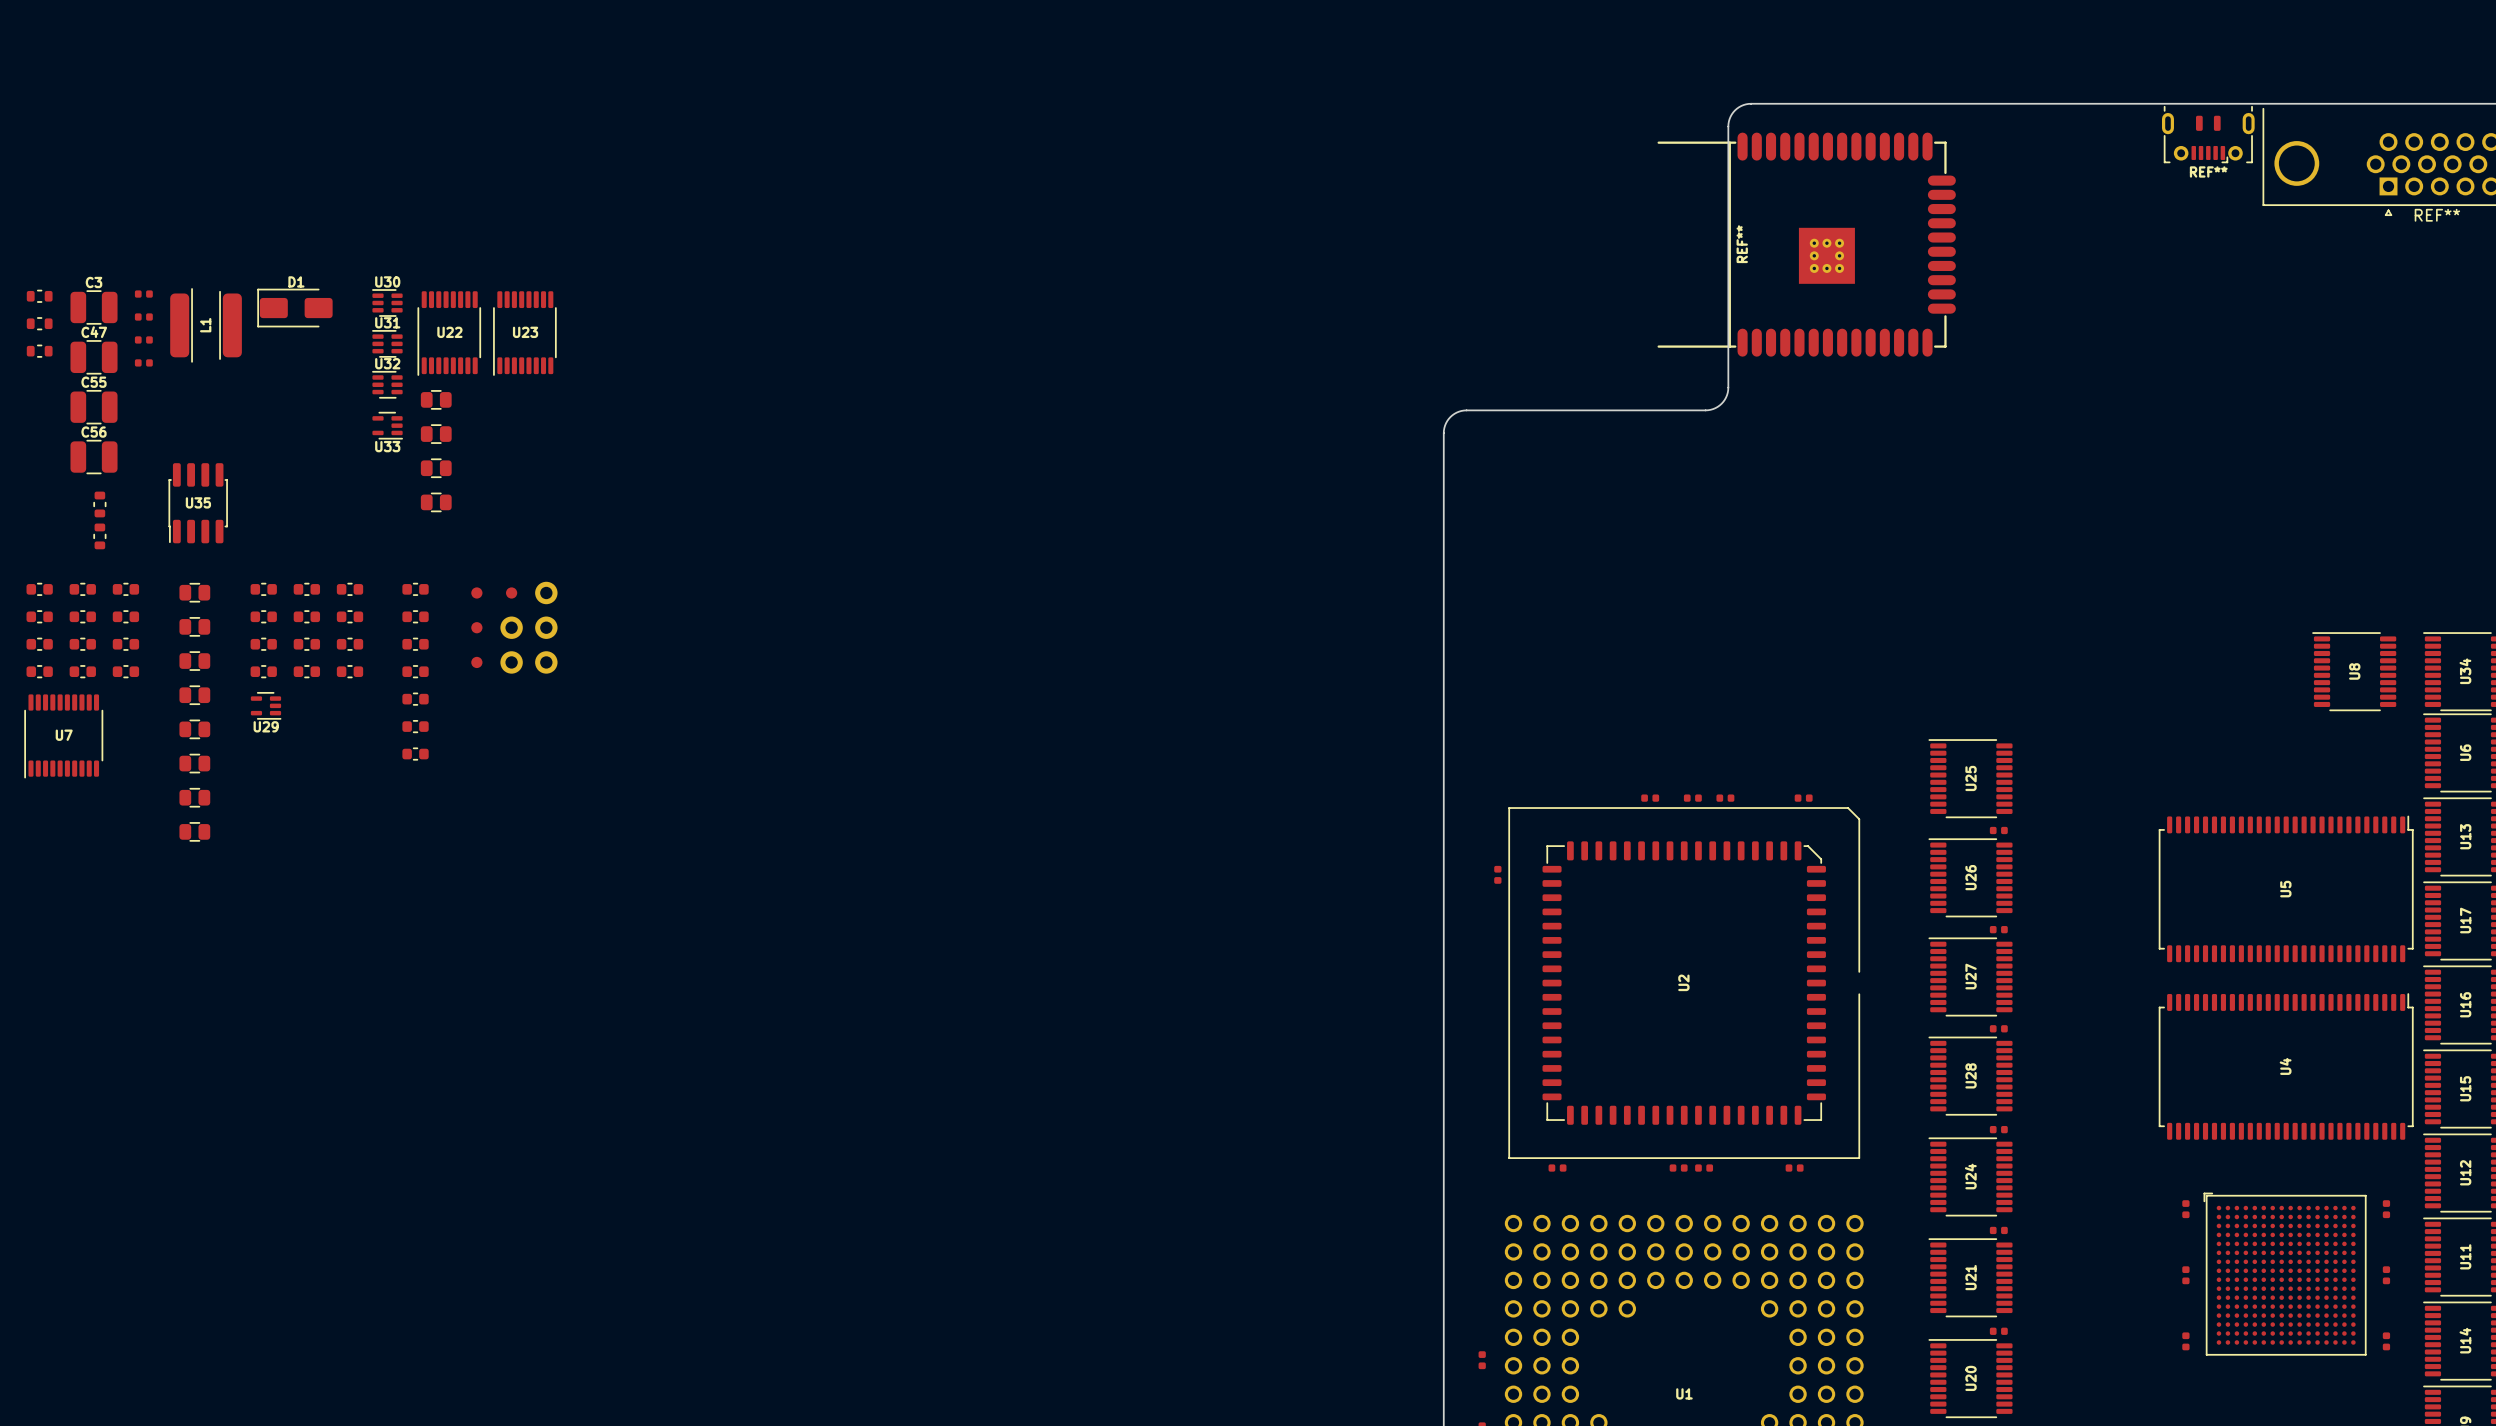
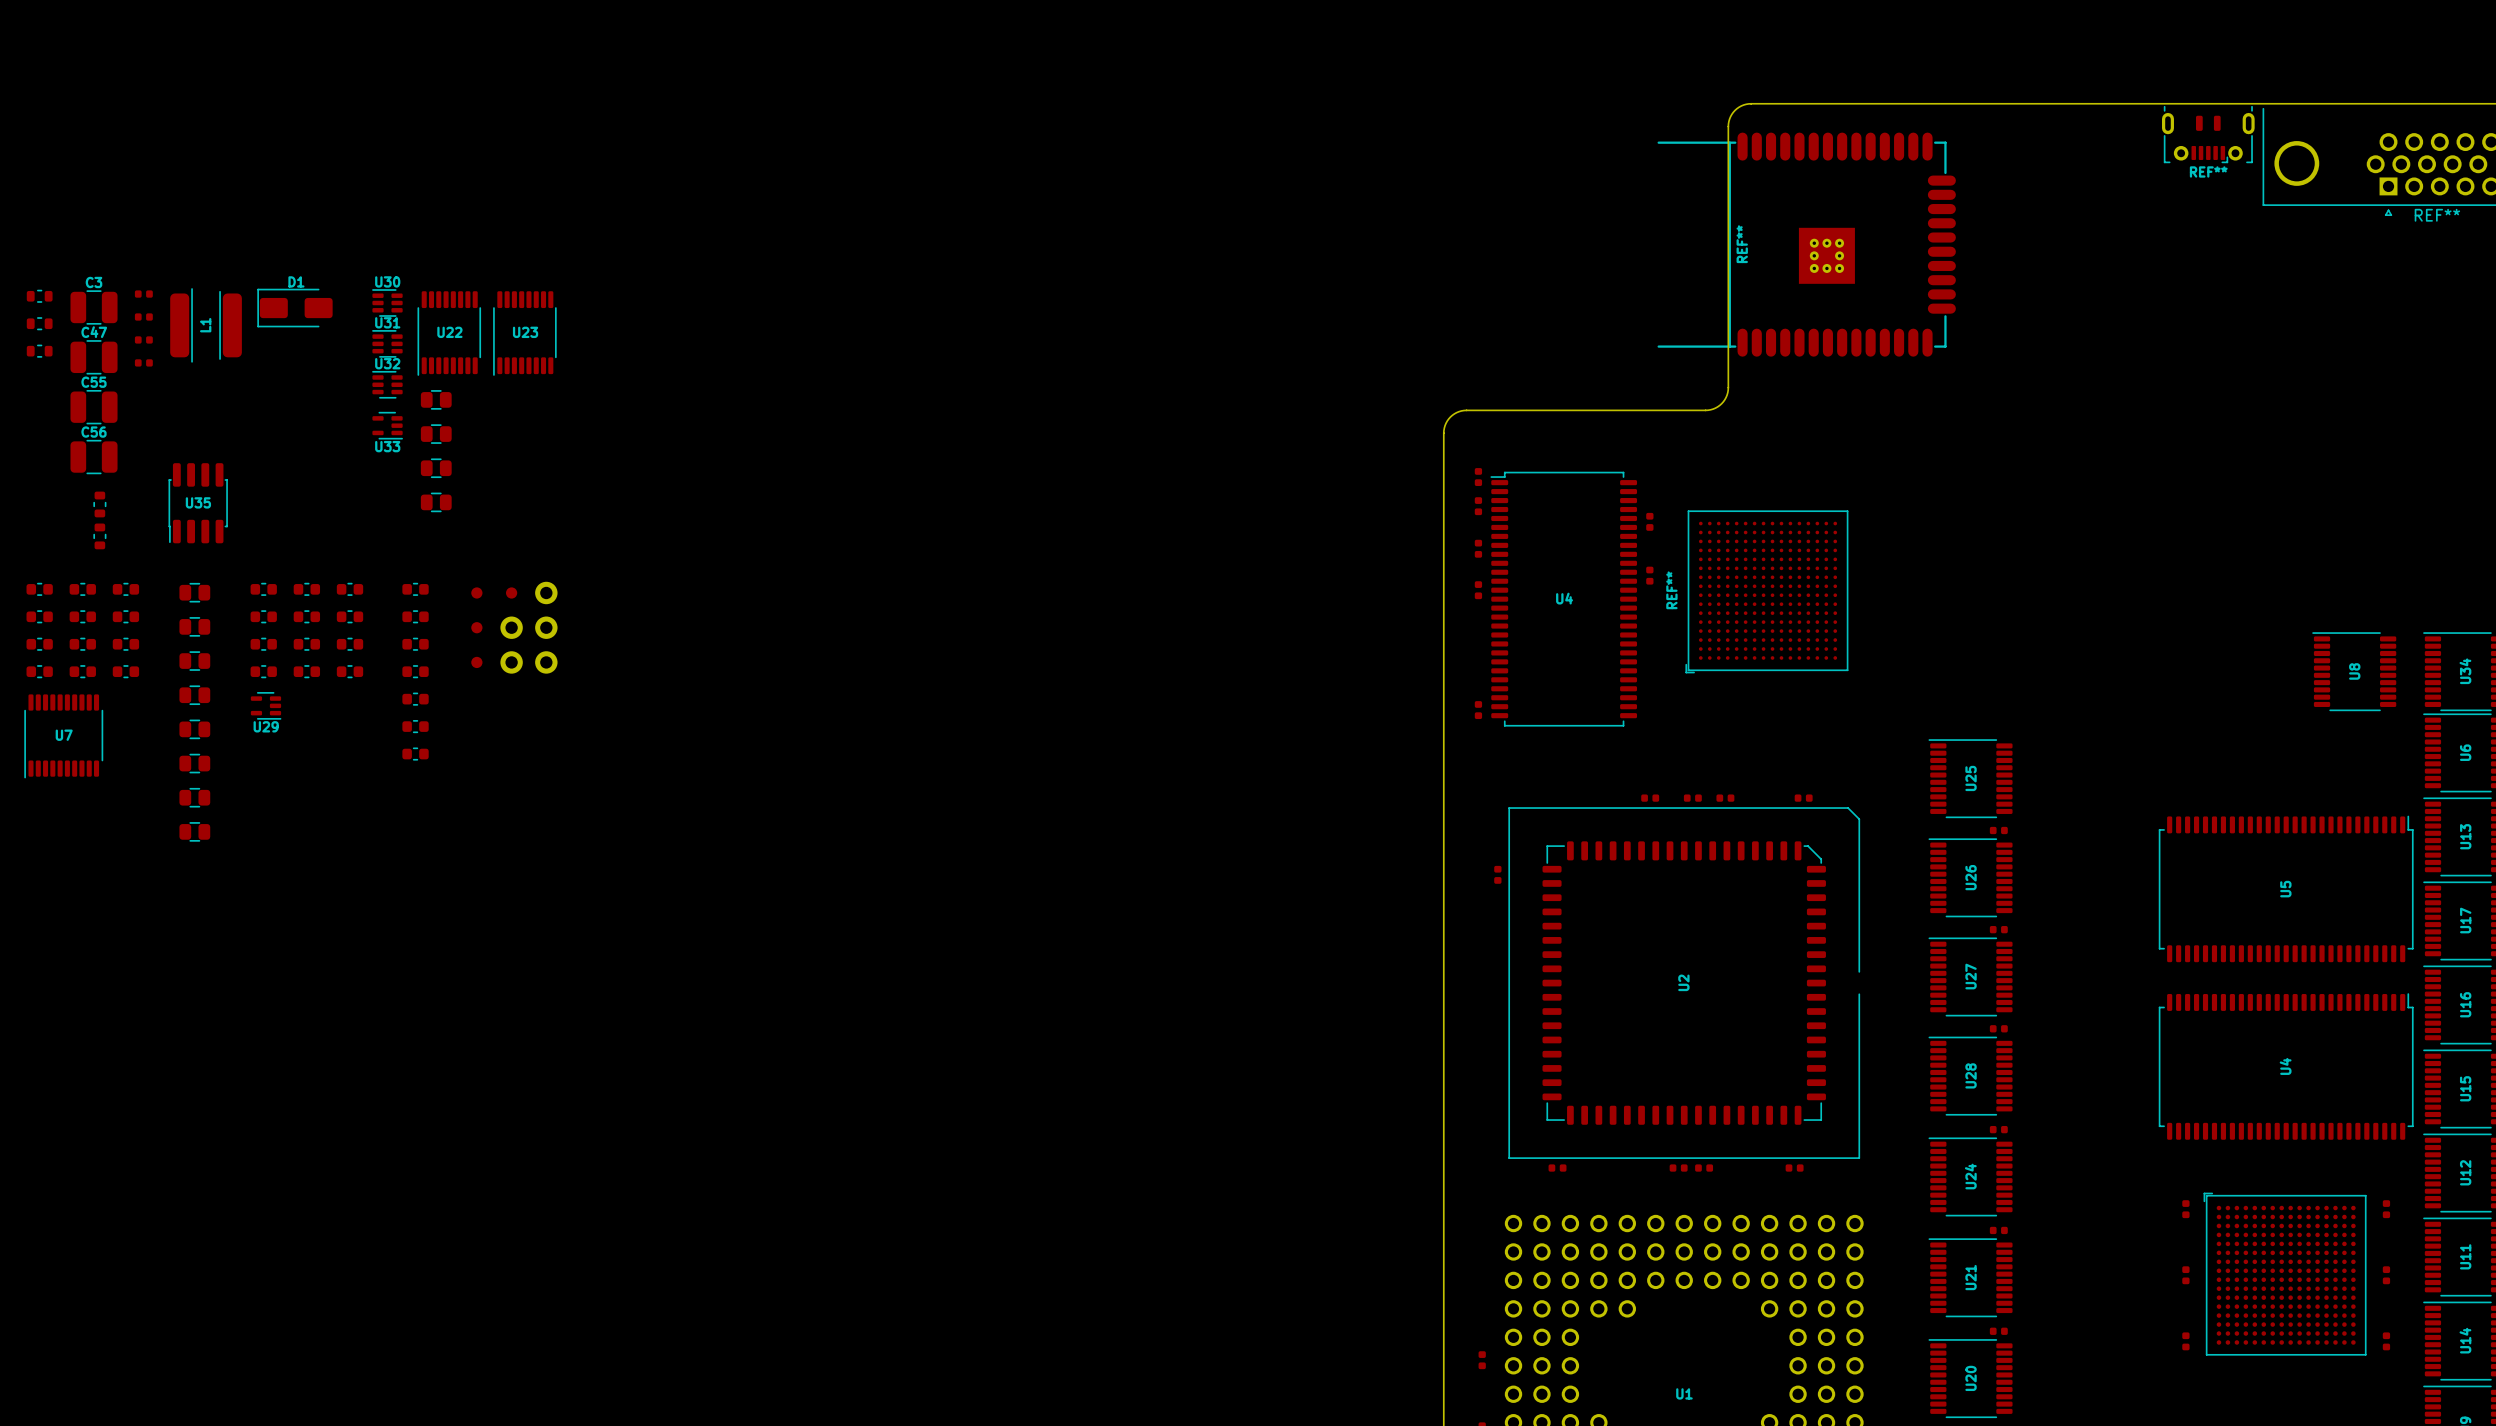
part: none -> (1478, 477)
part: none -> (1478, 506)
part: none -> (1649, 521)
part: none -> (1478, 548)
part: none -> (1649, 575)
part: none -> (1478, 590)
REF**: none -> (1766, 591)
U4: none -> (1563, 599)
part: none -> (1478, 710)

